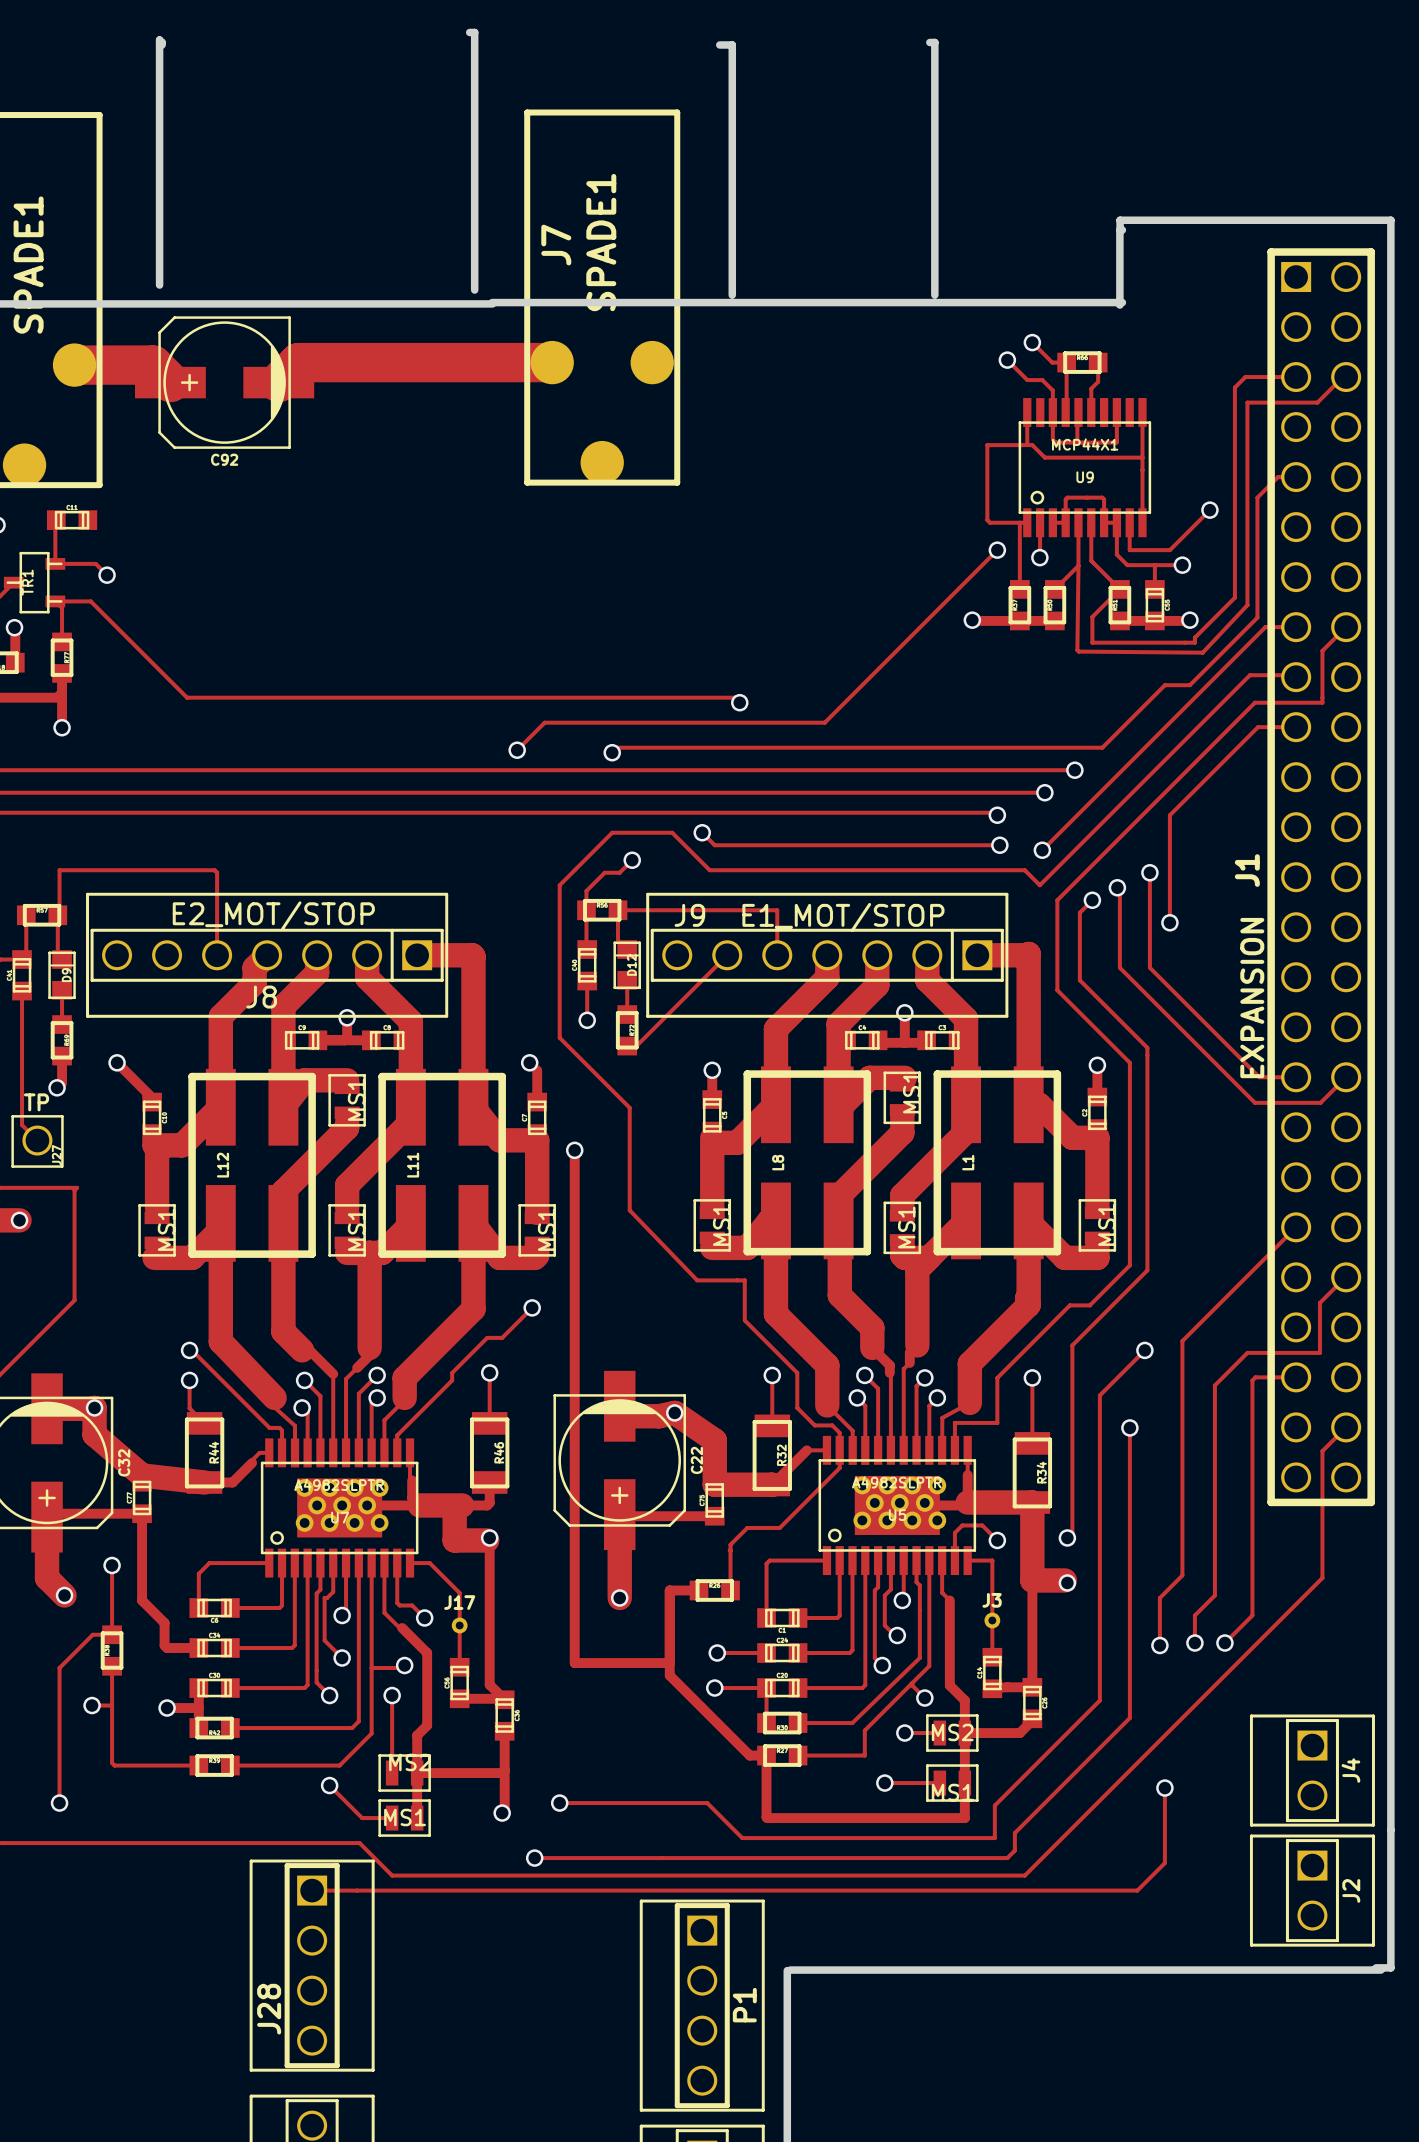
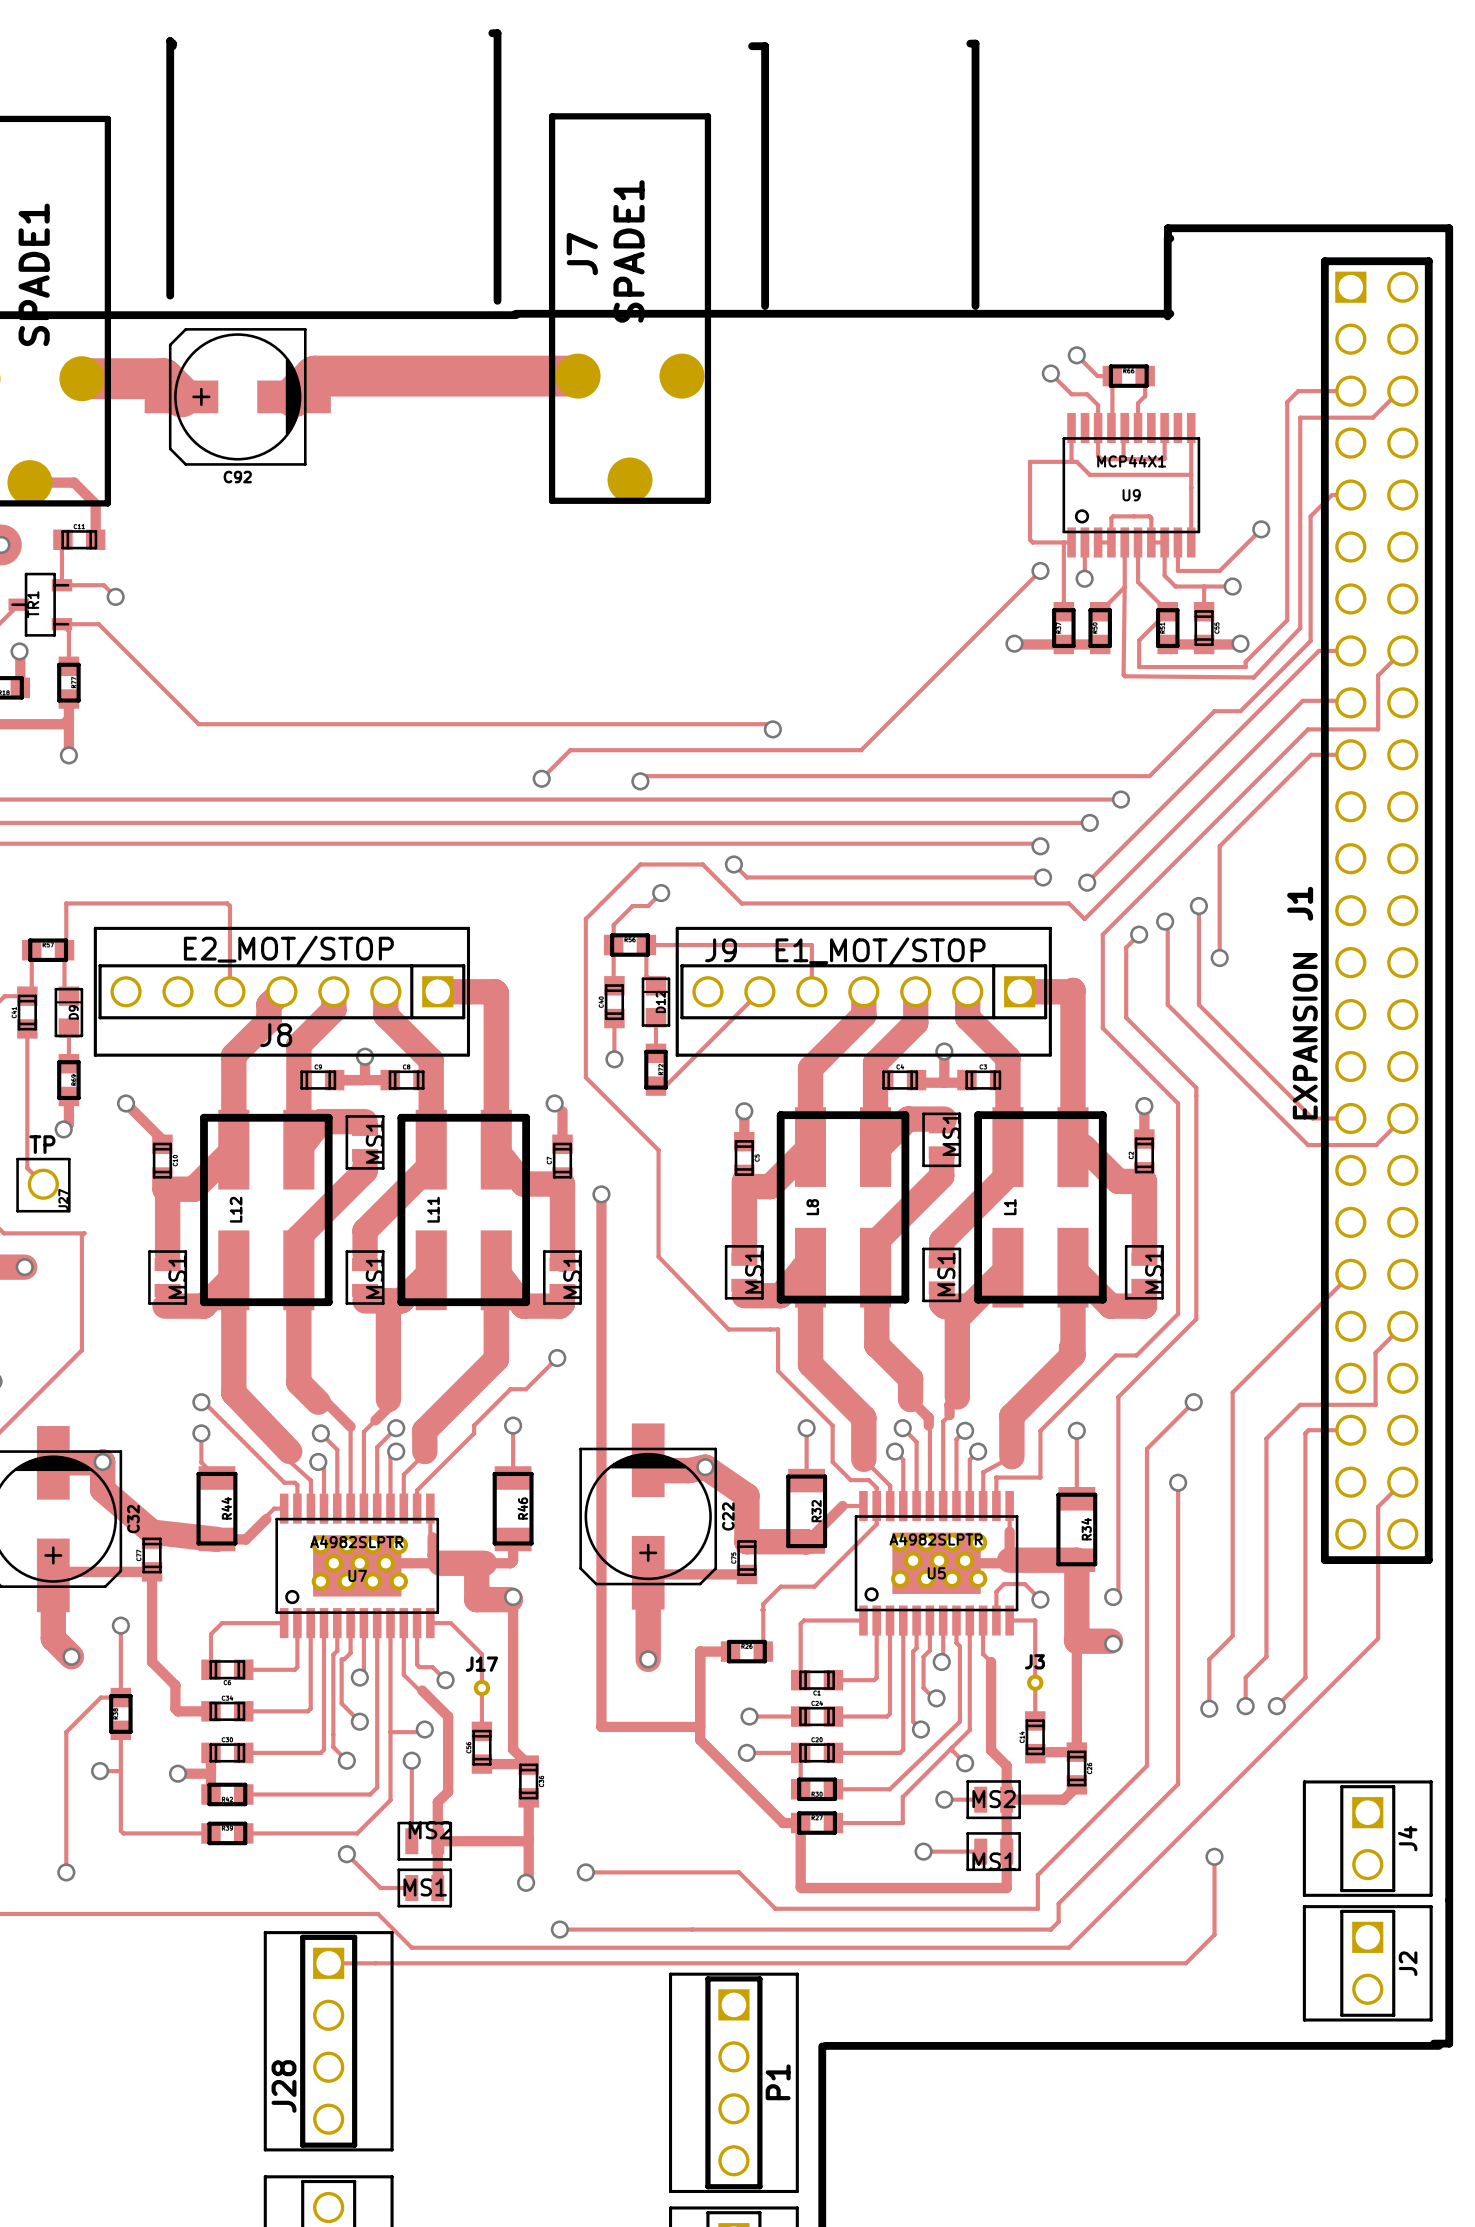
track: none -> (29, 482) (74, 482) (95, 504) (95, 539)

